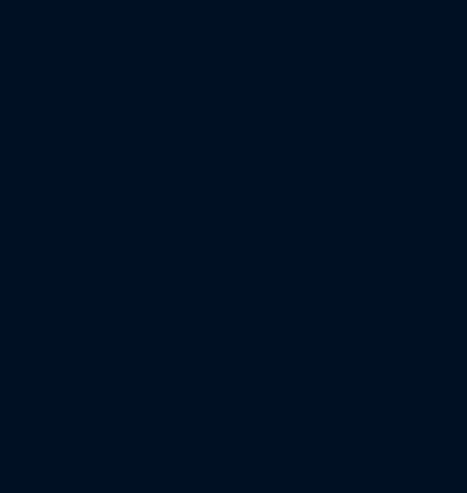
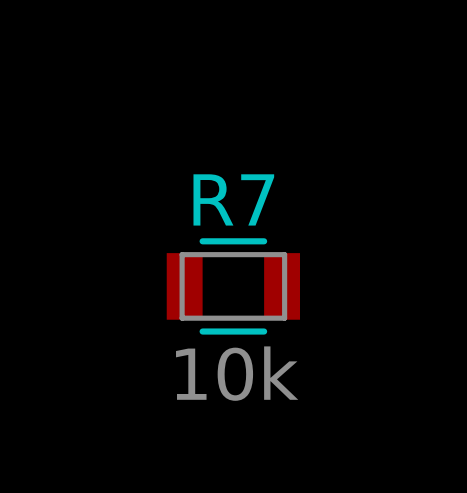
R7: none -> 10k (233, 286)

